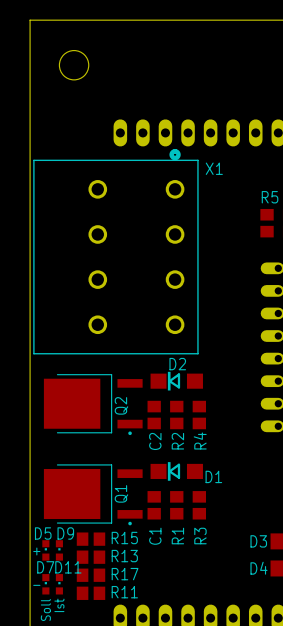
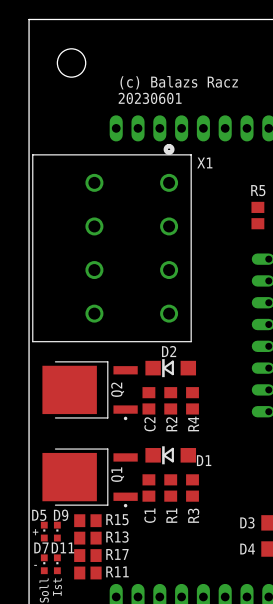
text: none -> (c) Balazs Racz (179, 82)
text: none -> 20230601 (150, 98)

